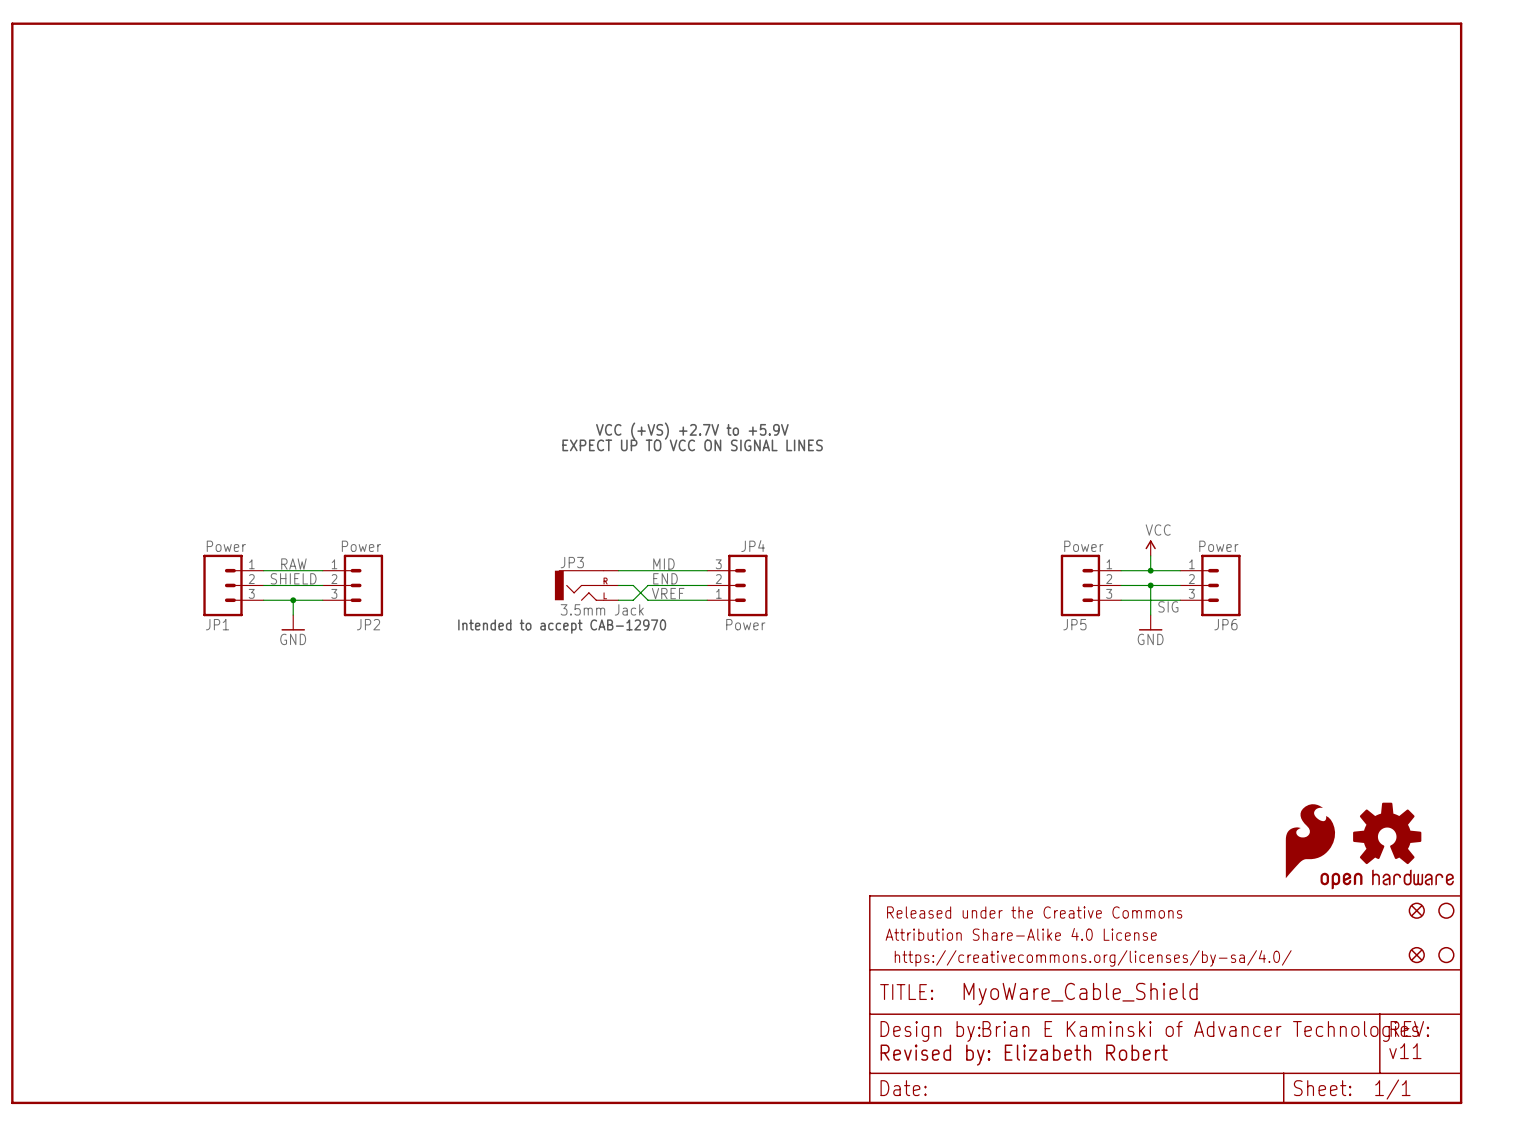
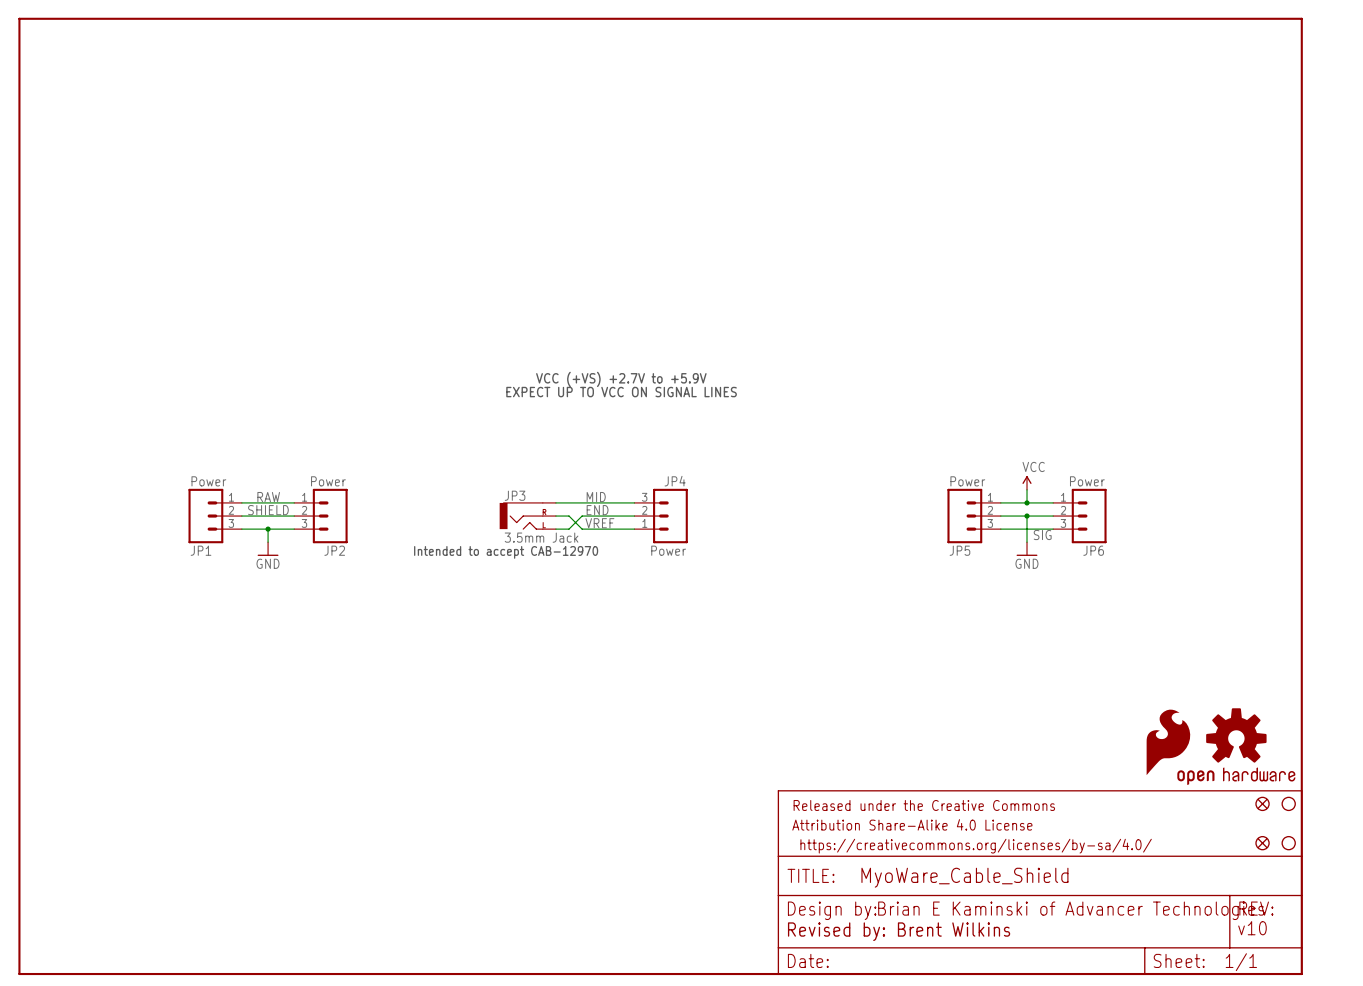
text: v11 (1405, 1051) -> v10 (1252, 928)
text: Revised by: Elizabeth Robert (1024, 1055) -> Revised by: Brent Wilkins (899, 931)

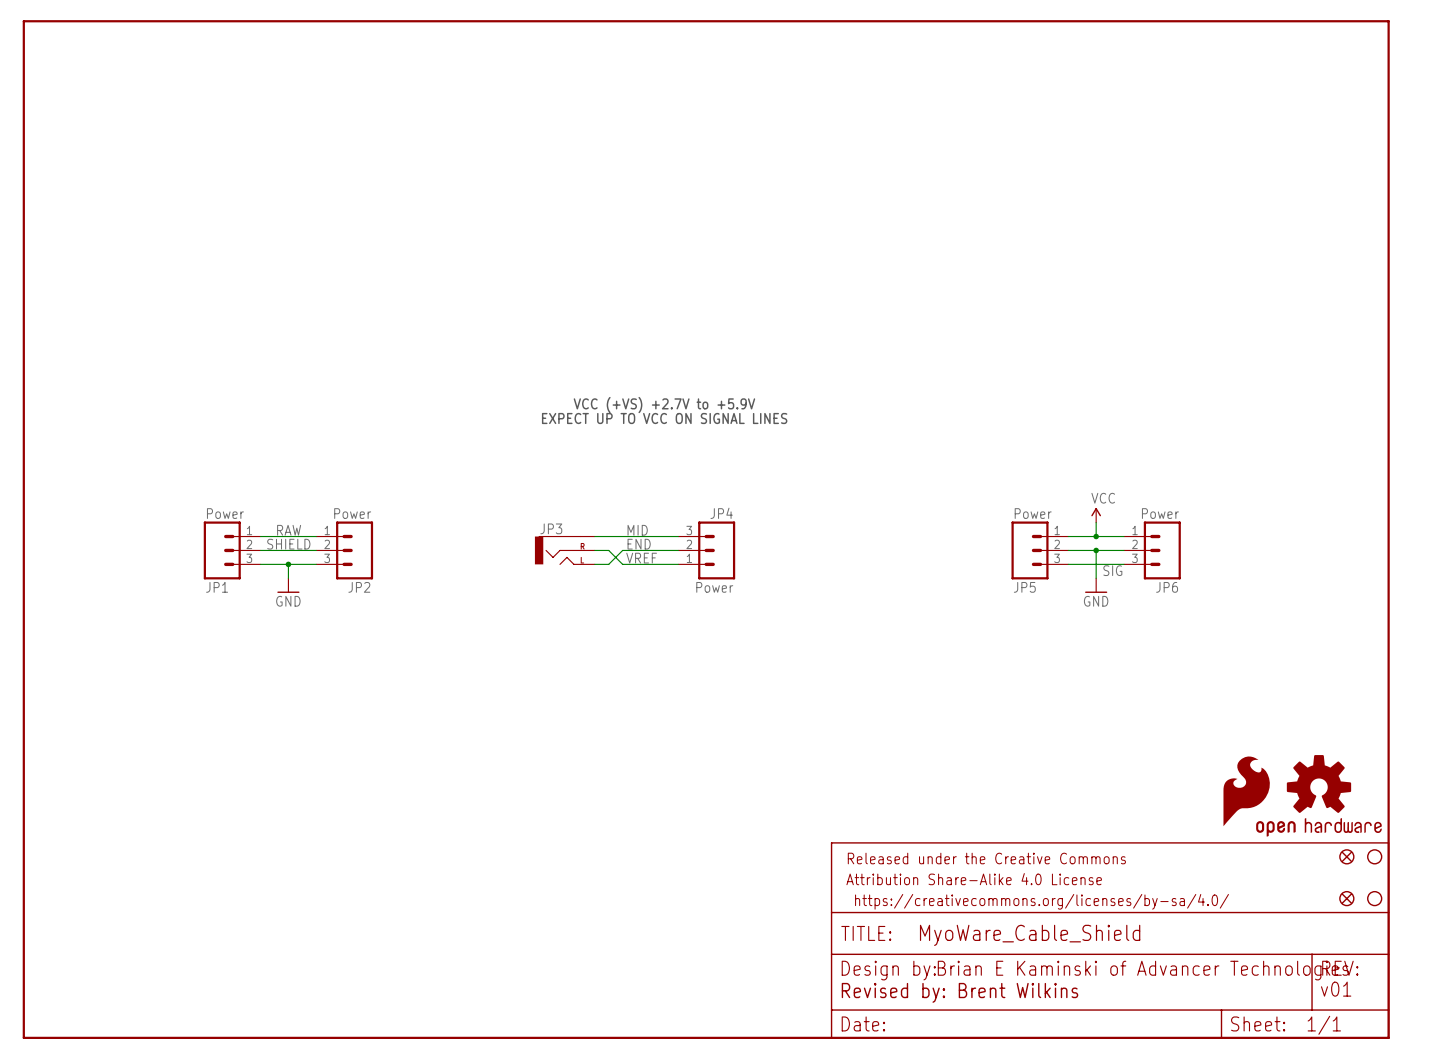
JP3 value: 3.5mm Jack (541, 537) -> none
text: Intended to accept CAB-12970 (506, 552) -> none
text: v10 (1252, 928) -> v01 (1336, 989)

